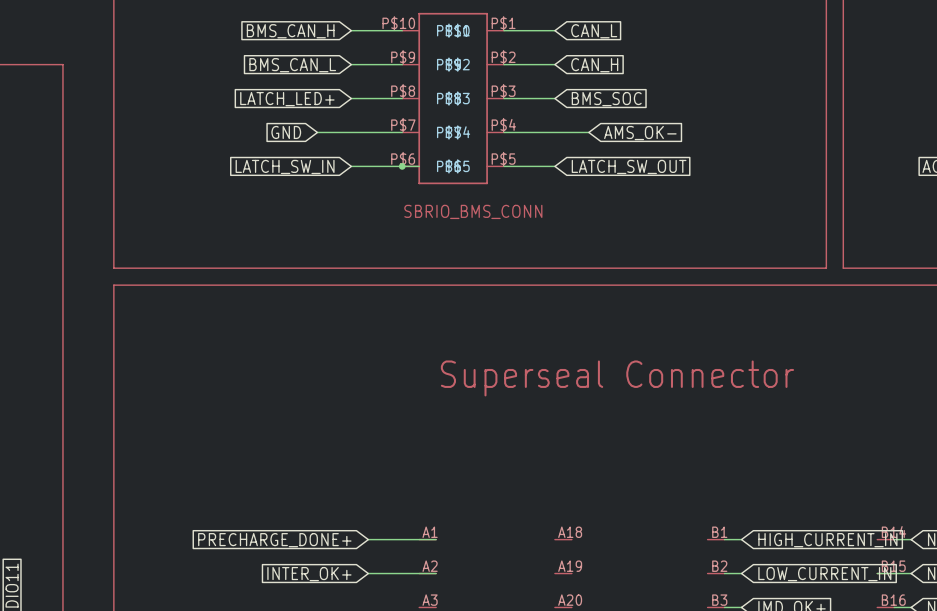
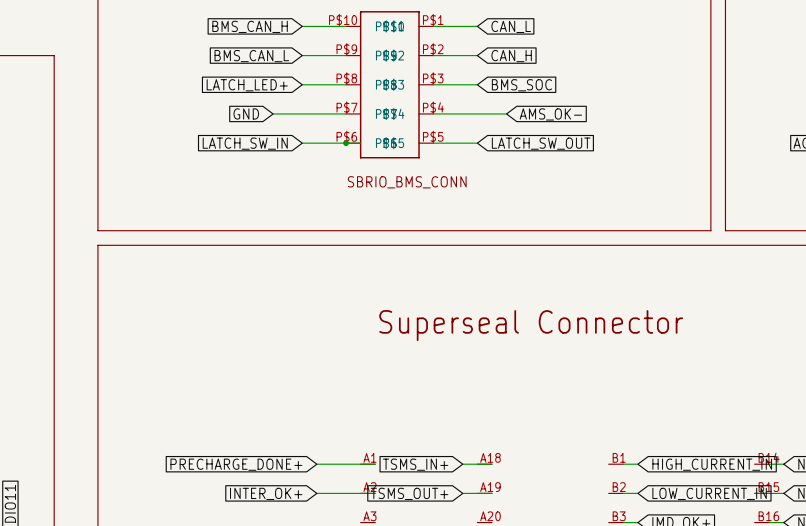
wire: none -> (462, 464) (491, 464)
global label: none -> TSMS_IN+ (415, 464)
wire: none -> (462, 493) (491, 493)
global label: none -> TSMS_OUT+ (409, 493)

